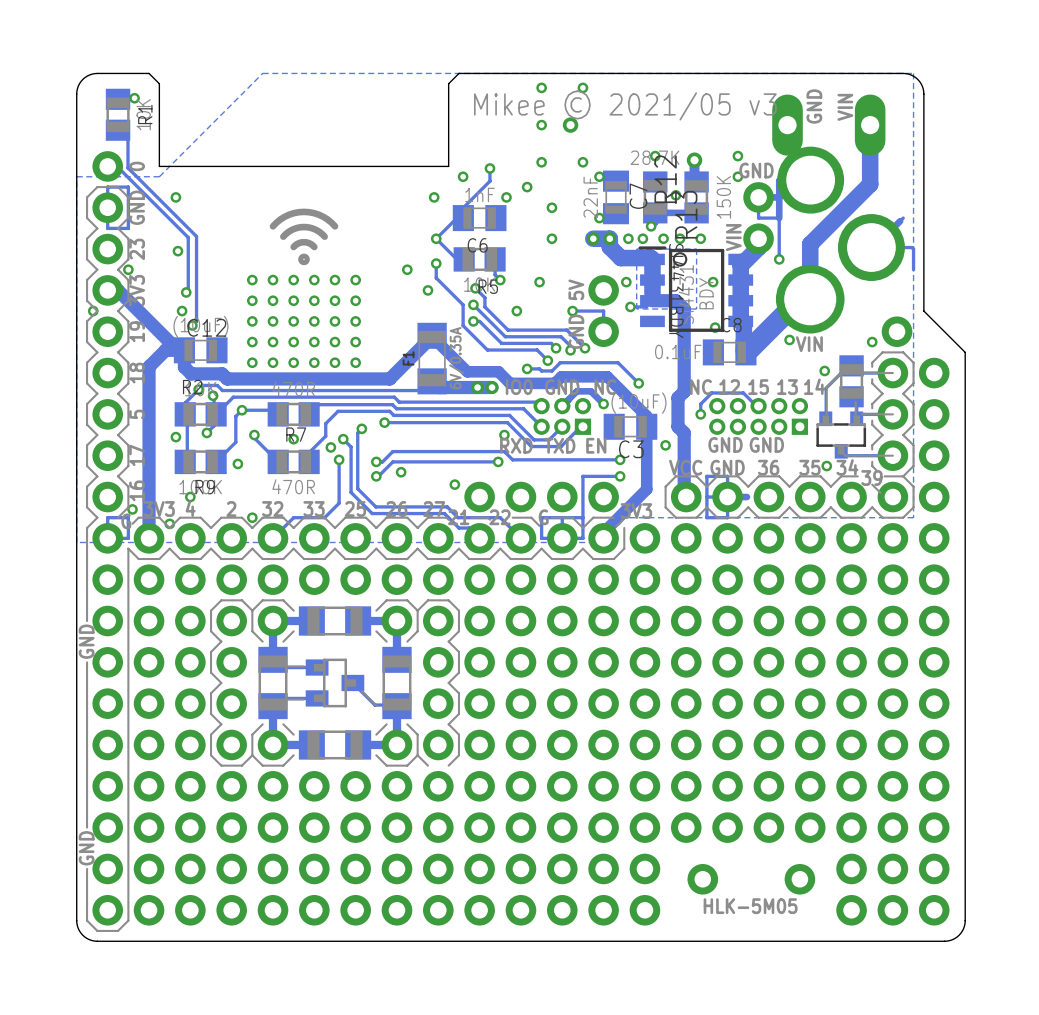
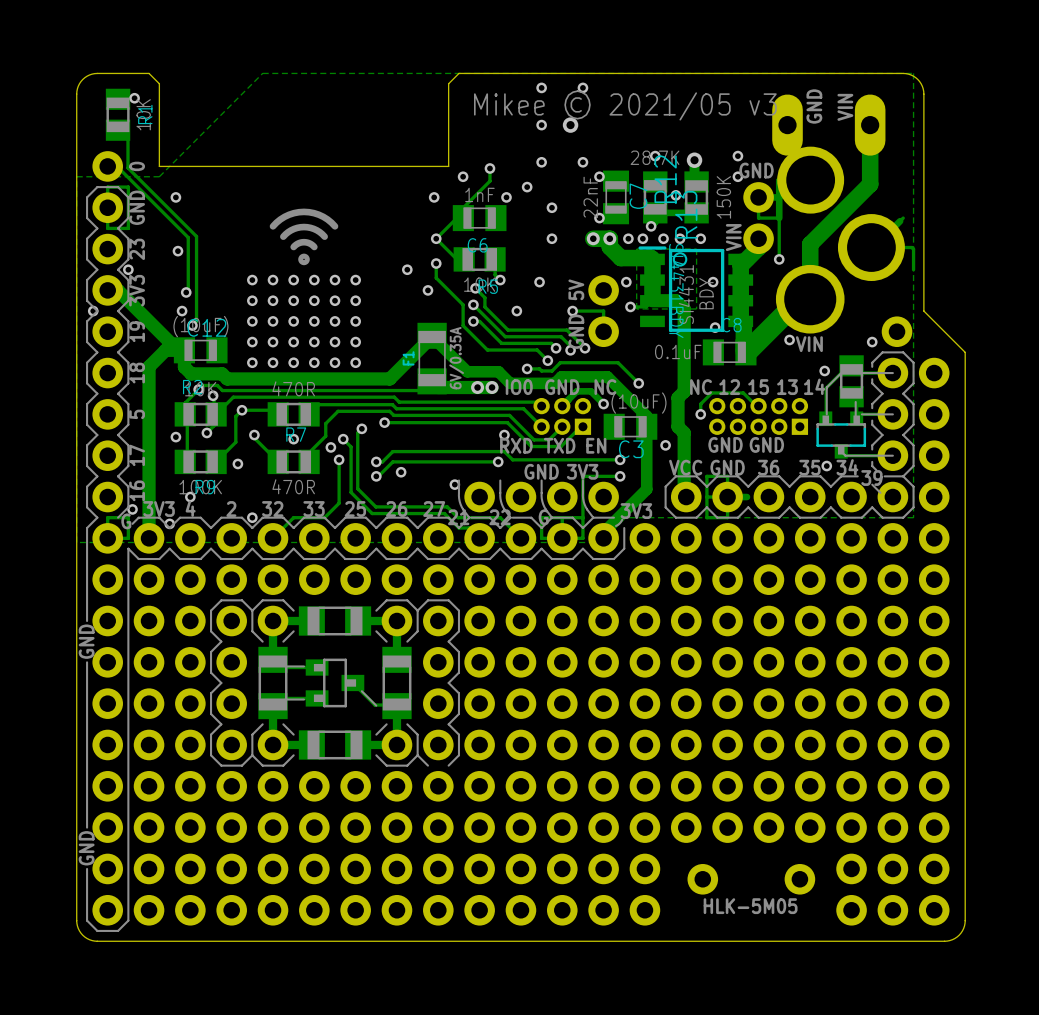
text: none -> GND (541, 471)
text: none -> 3V3 (582, 471)
line: none -> (541, 480) (542, 501) (551, 517) (541, 528) (539, 525)
line: none -> (582, 480) (583, 501) (593, 517)
line: (446, 517) (448, 519) -> (446, 517) (458, 528) (469, 517) (459, 501) (458, 480)
line: (487, 517) (489, 519) -> (487, 517) (500, 528) (510, 517) (501, 501) (500, 480)

